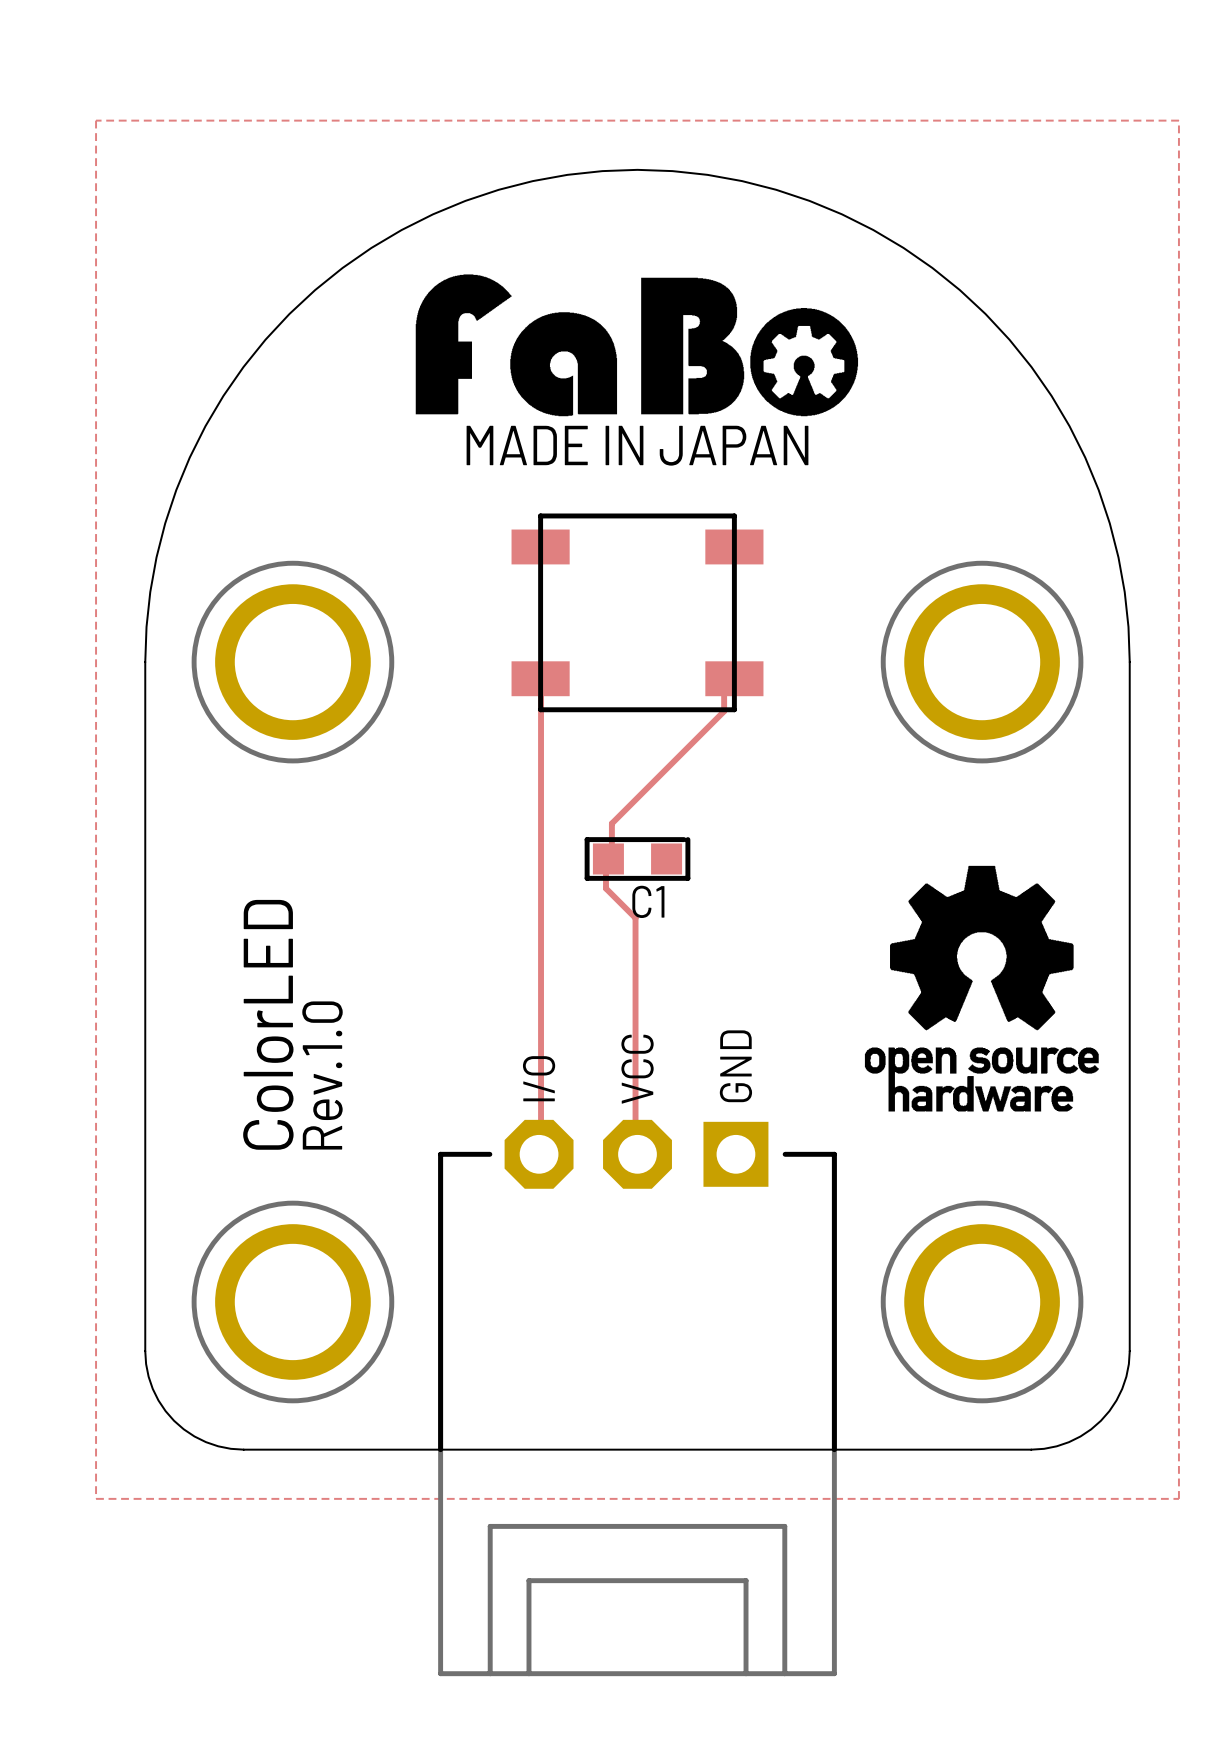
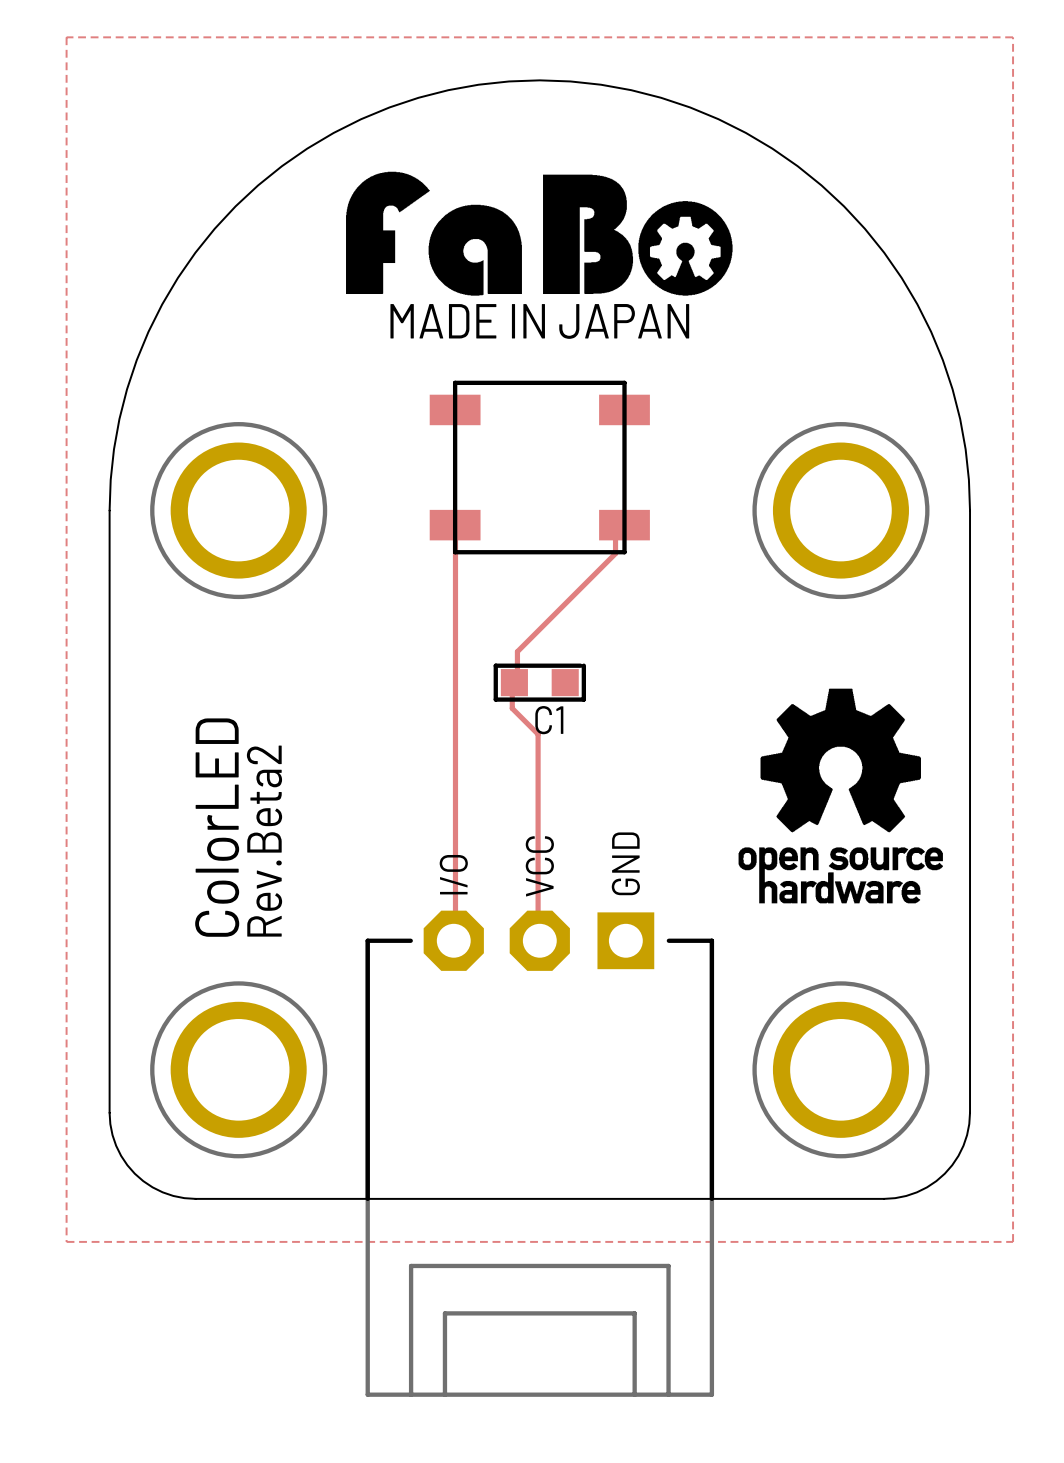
text: Rev.1.0 (322, 1075) -> Rev.Beta2 (264, 841)

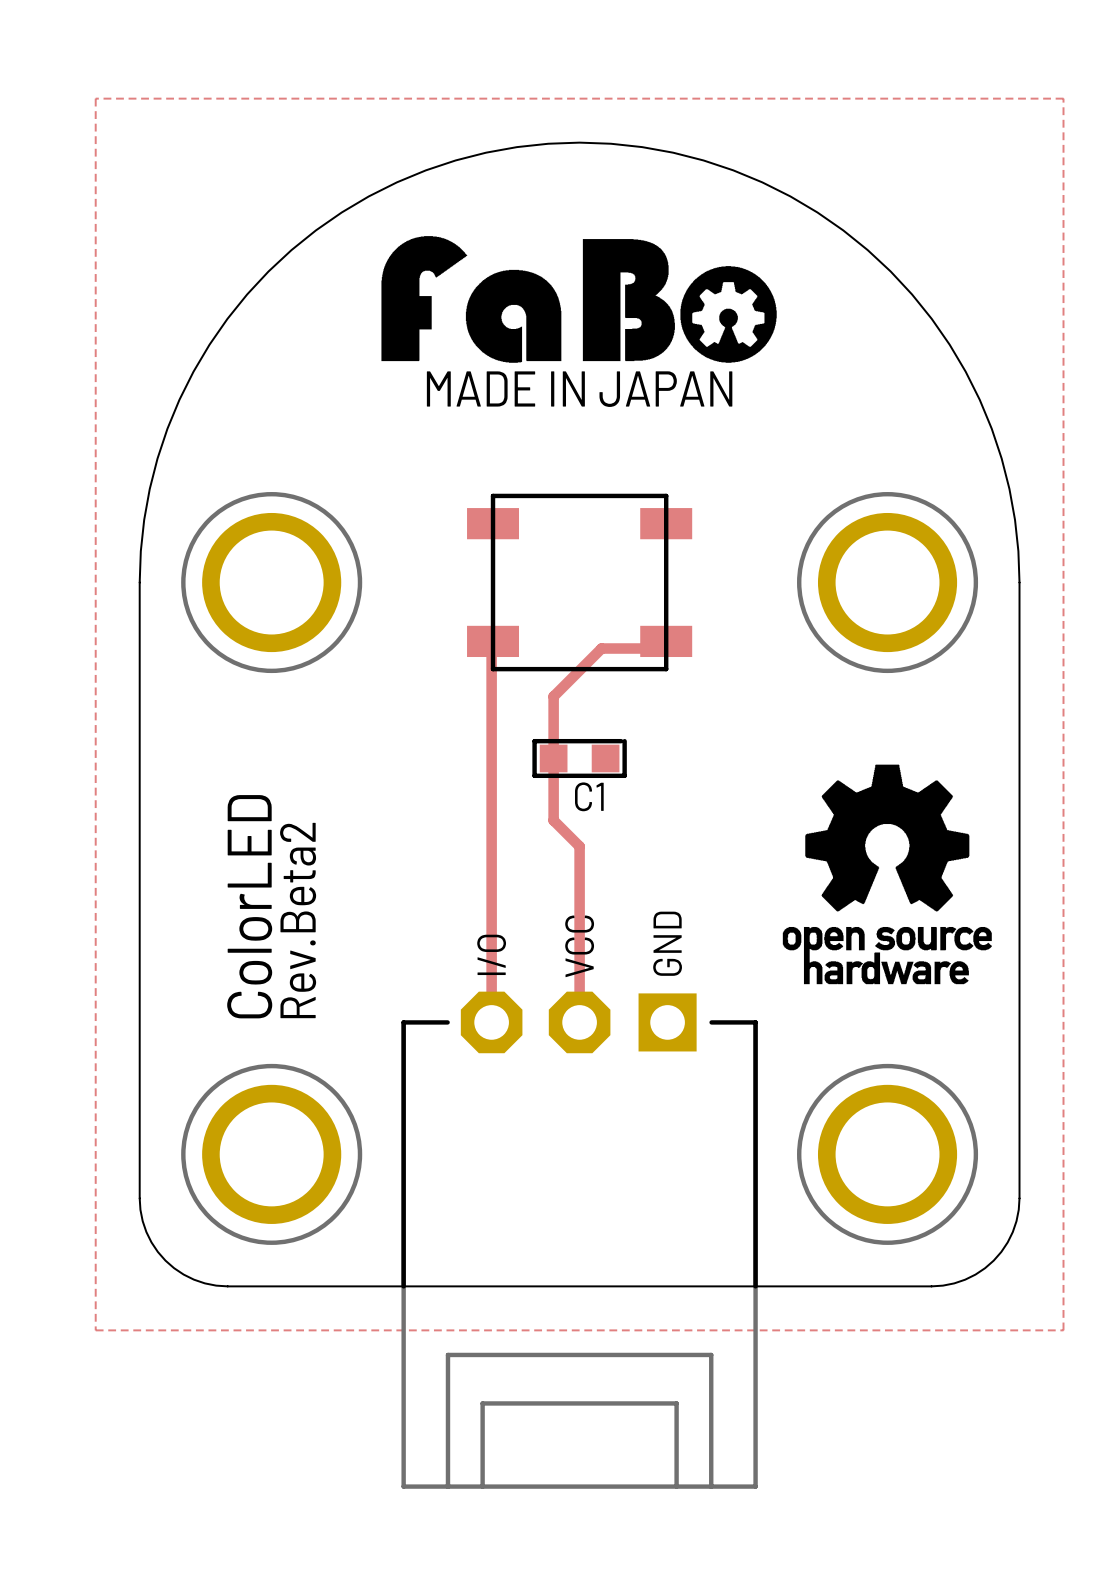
part position: (539, 467) -> (579, 582)
track: (455, 525) (455, 940) (453, 940) -> (493, 641) (491, 1022)
track: (624, 525) (615, 532) (615, 553) (517, 651) (517, 682) (512, 682) (512, 708) (538, 734) (538, 940) (539, 940) -> (666, 641) (659, 648) (601, 648) (553, 696) (553, 820) (579, 846) (579, 1022)

